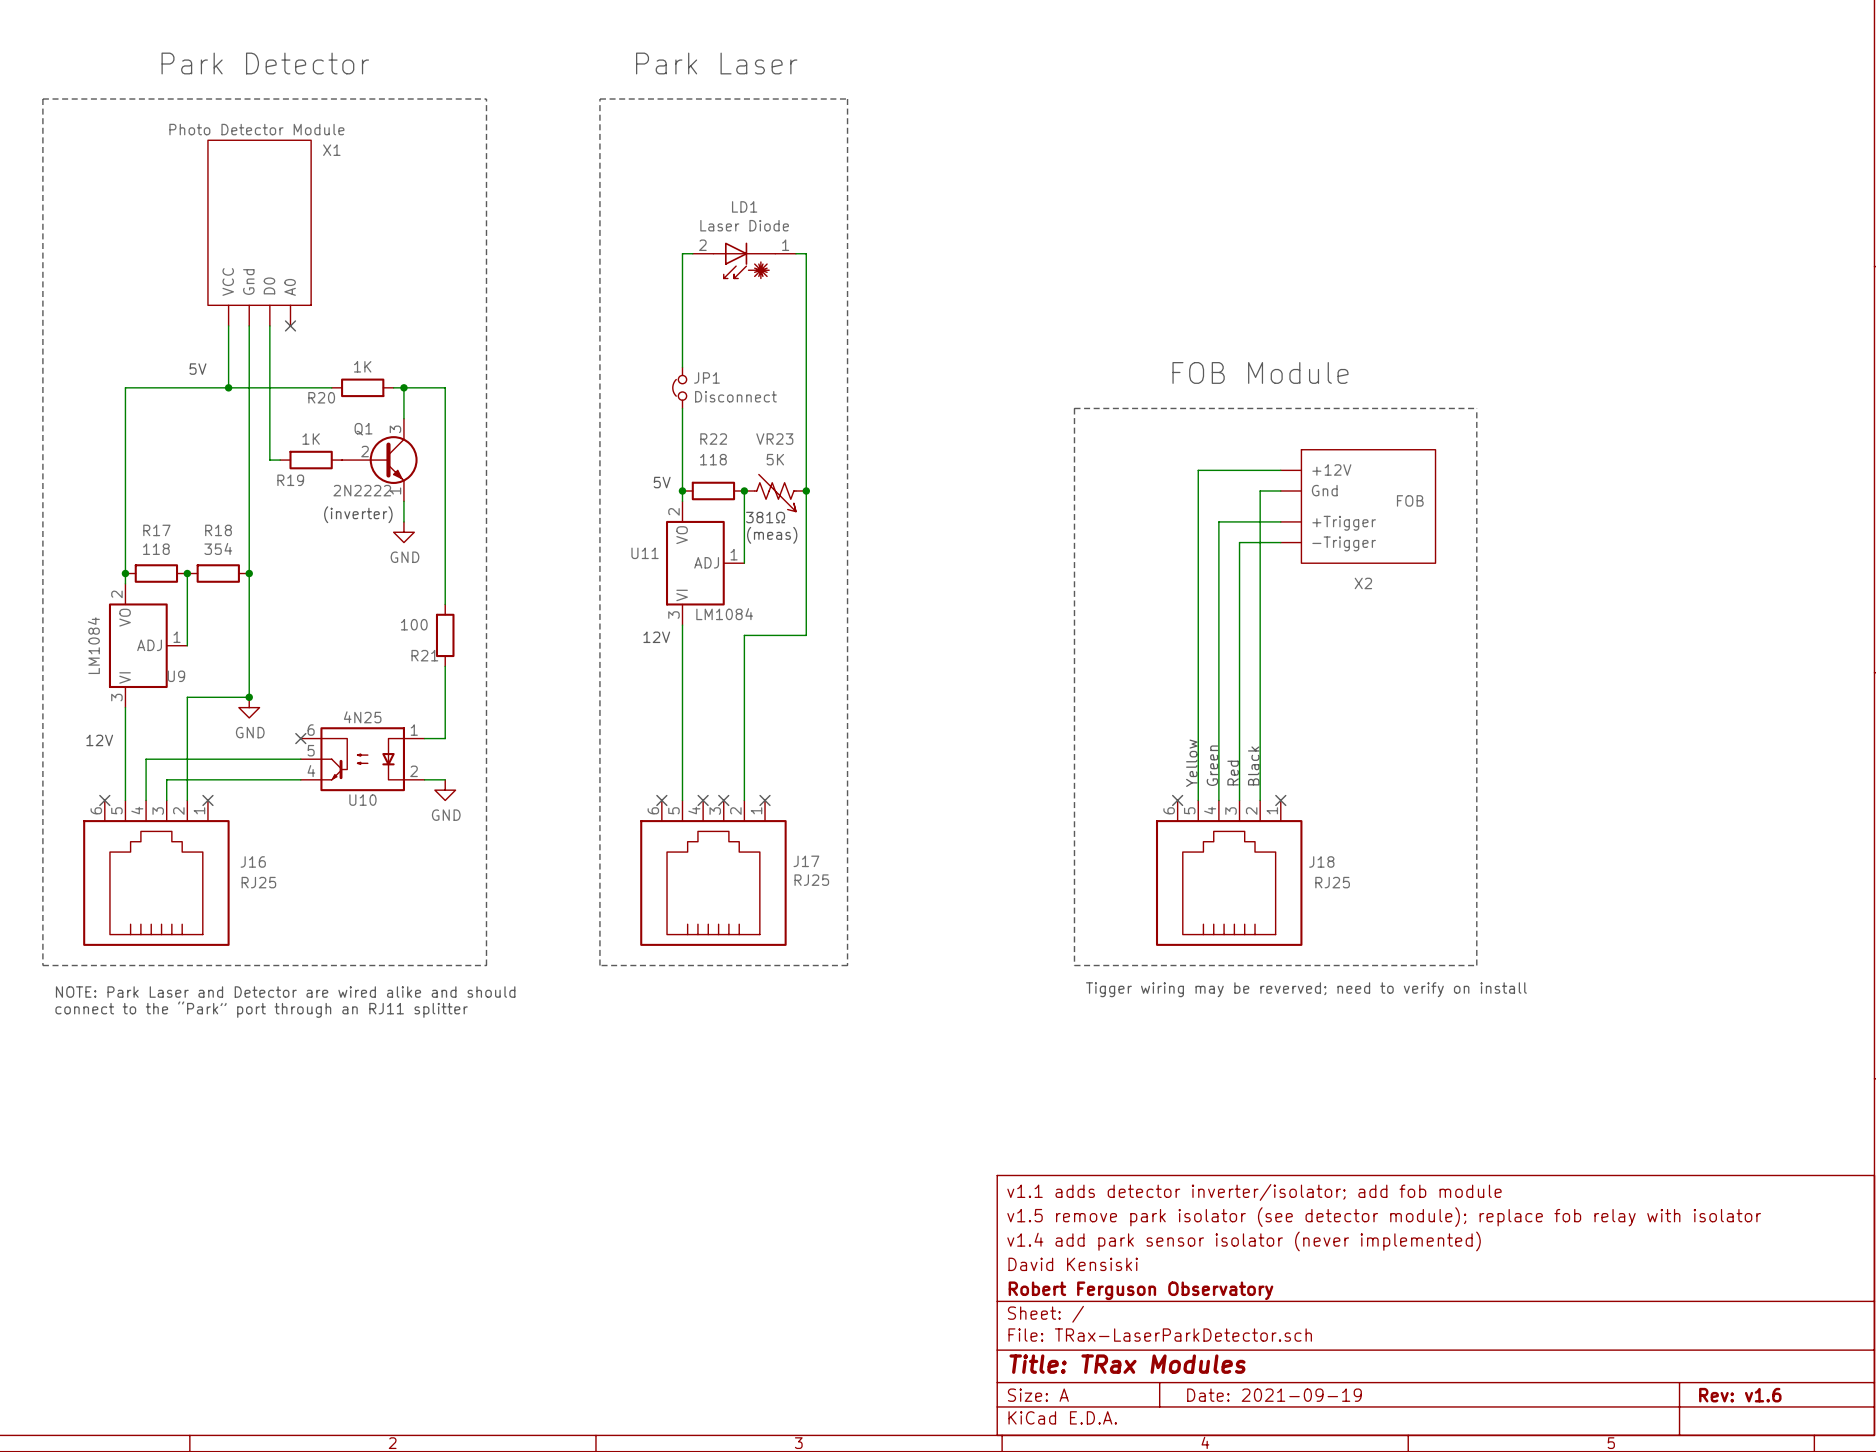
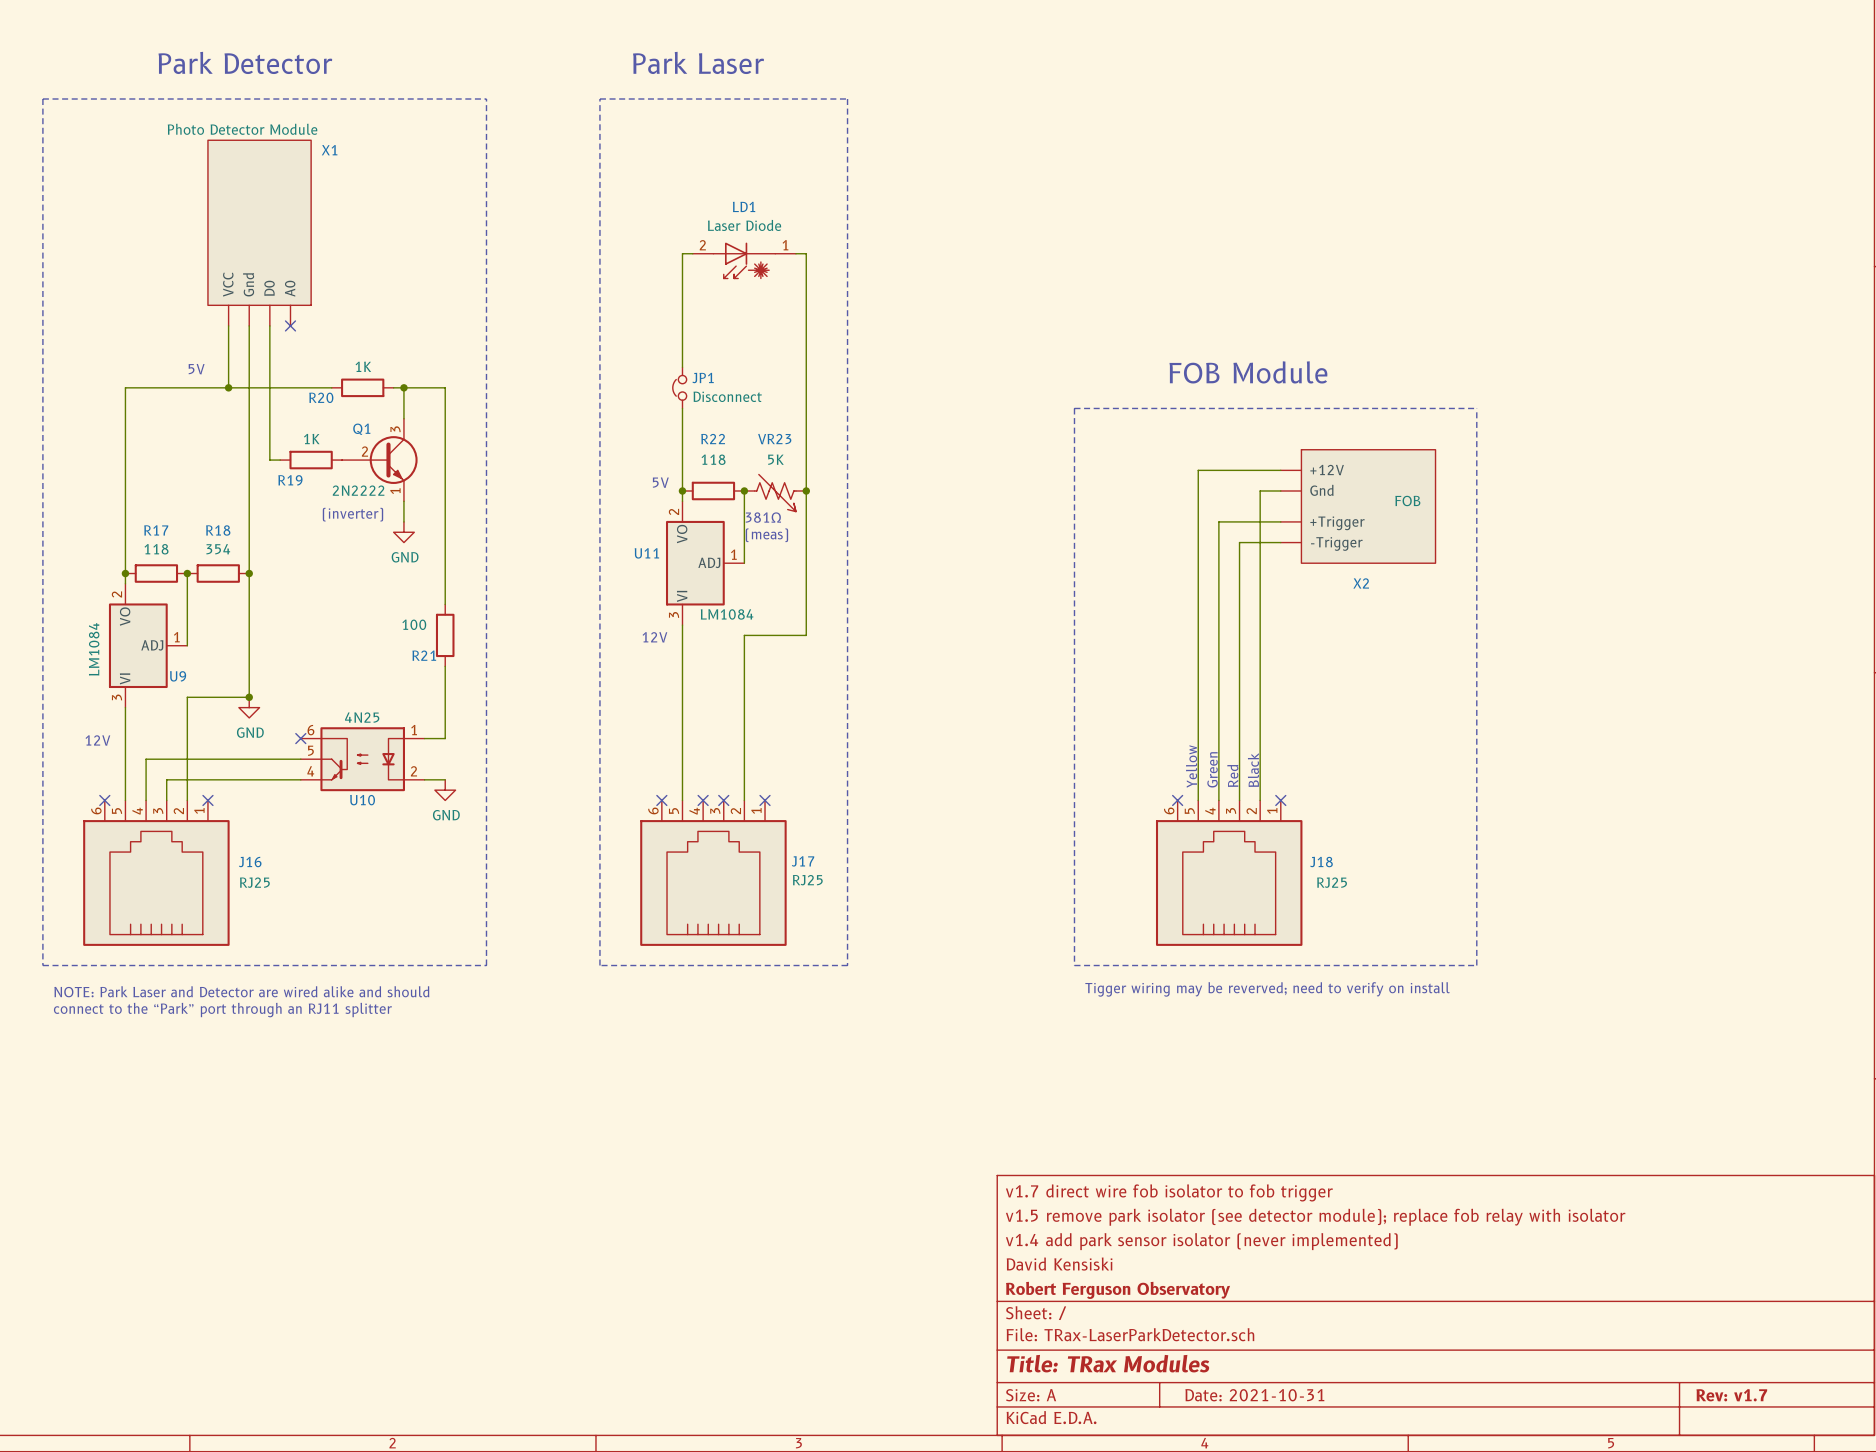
title block: v1.1 adds detector inverter/isolator; add fob module (1254, 1192) -> v1.7 direct wire fob isolator to fob trigger (1169, 1192)
title block: Date: 2021-09-19 (1274, 1395) -> Date: 2021-10-31 (1254, 1395)
title block: Rev: v1.6 (1740, 1395) -> Rev: v1.7 (1731, 1395)

